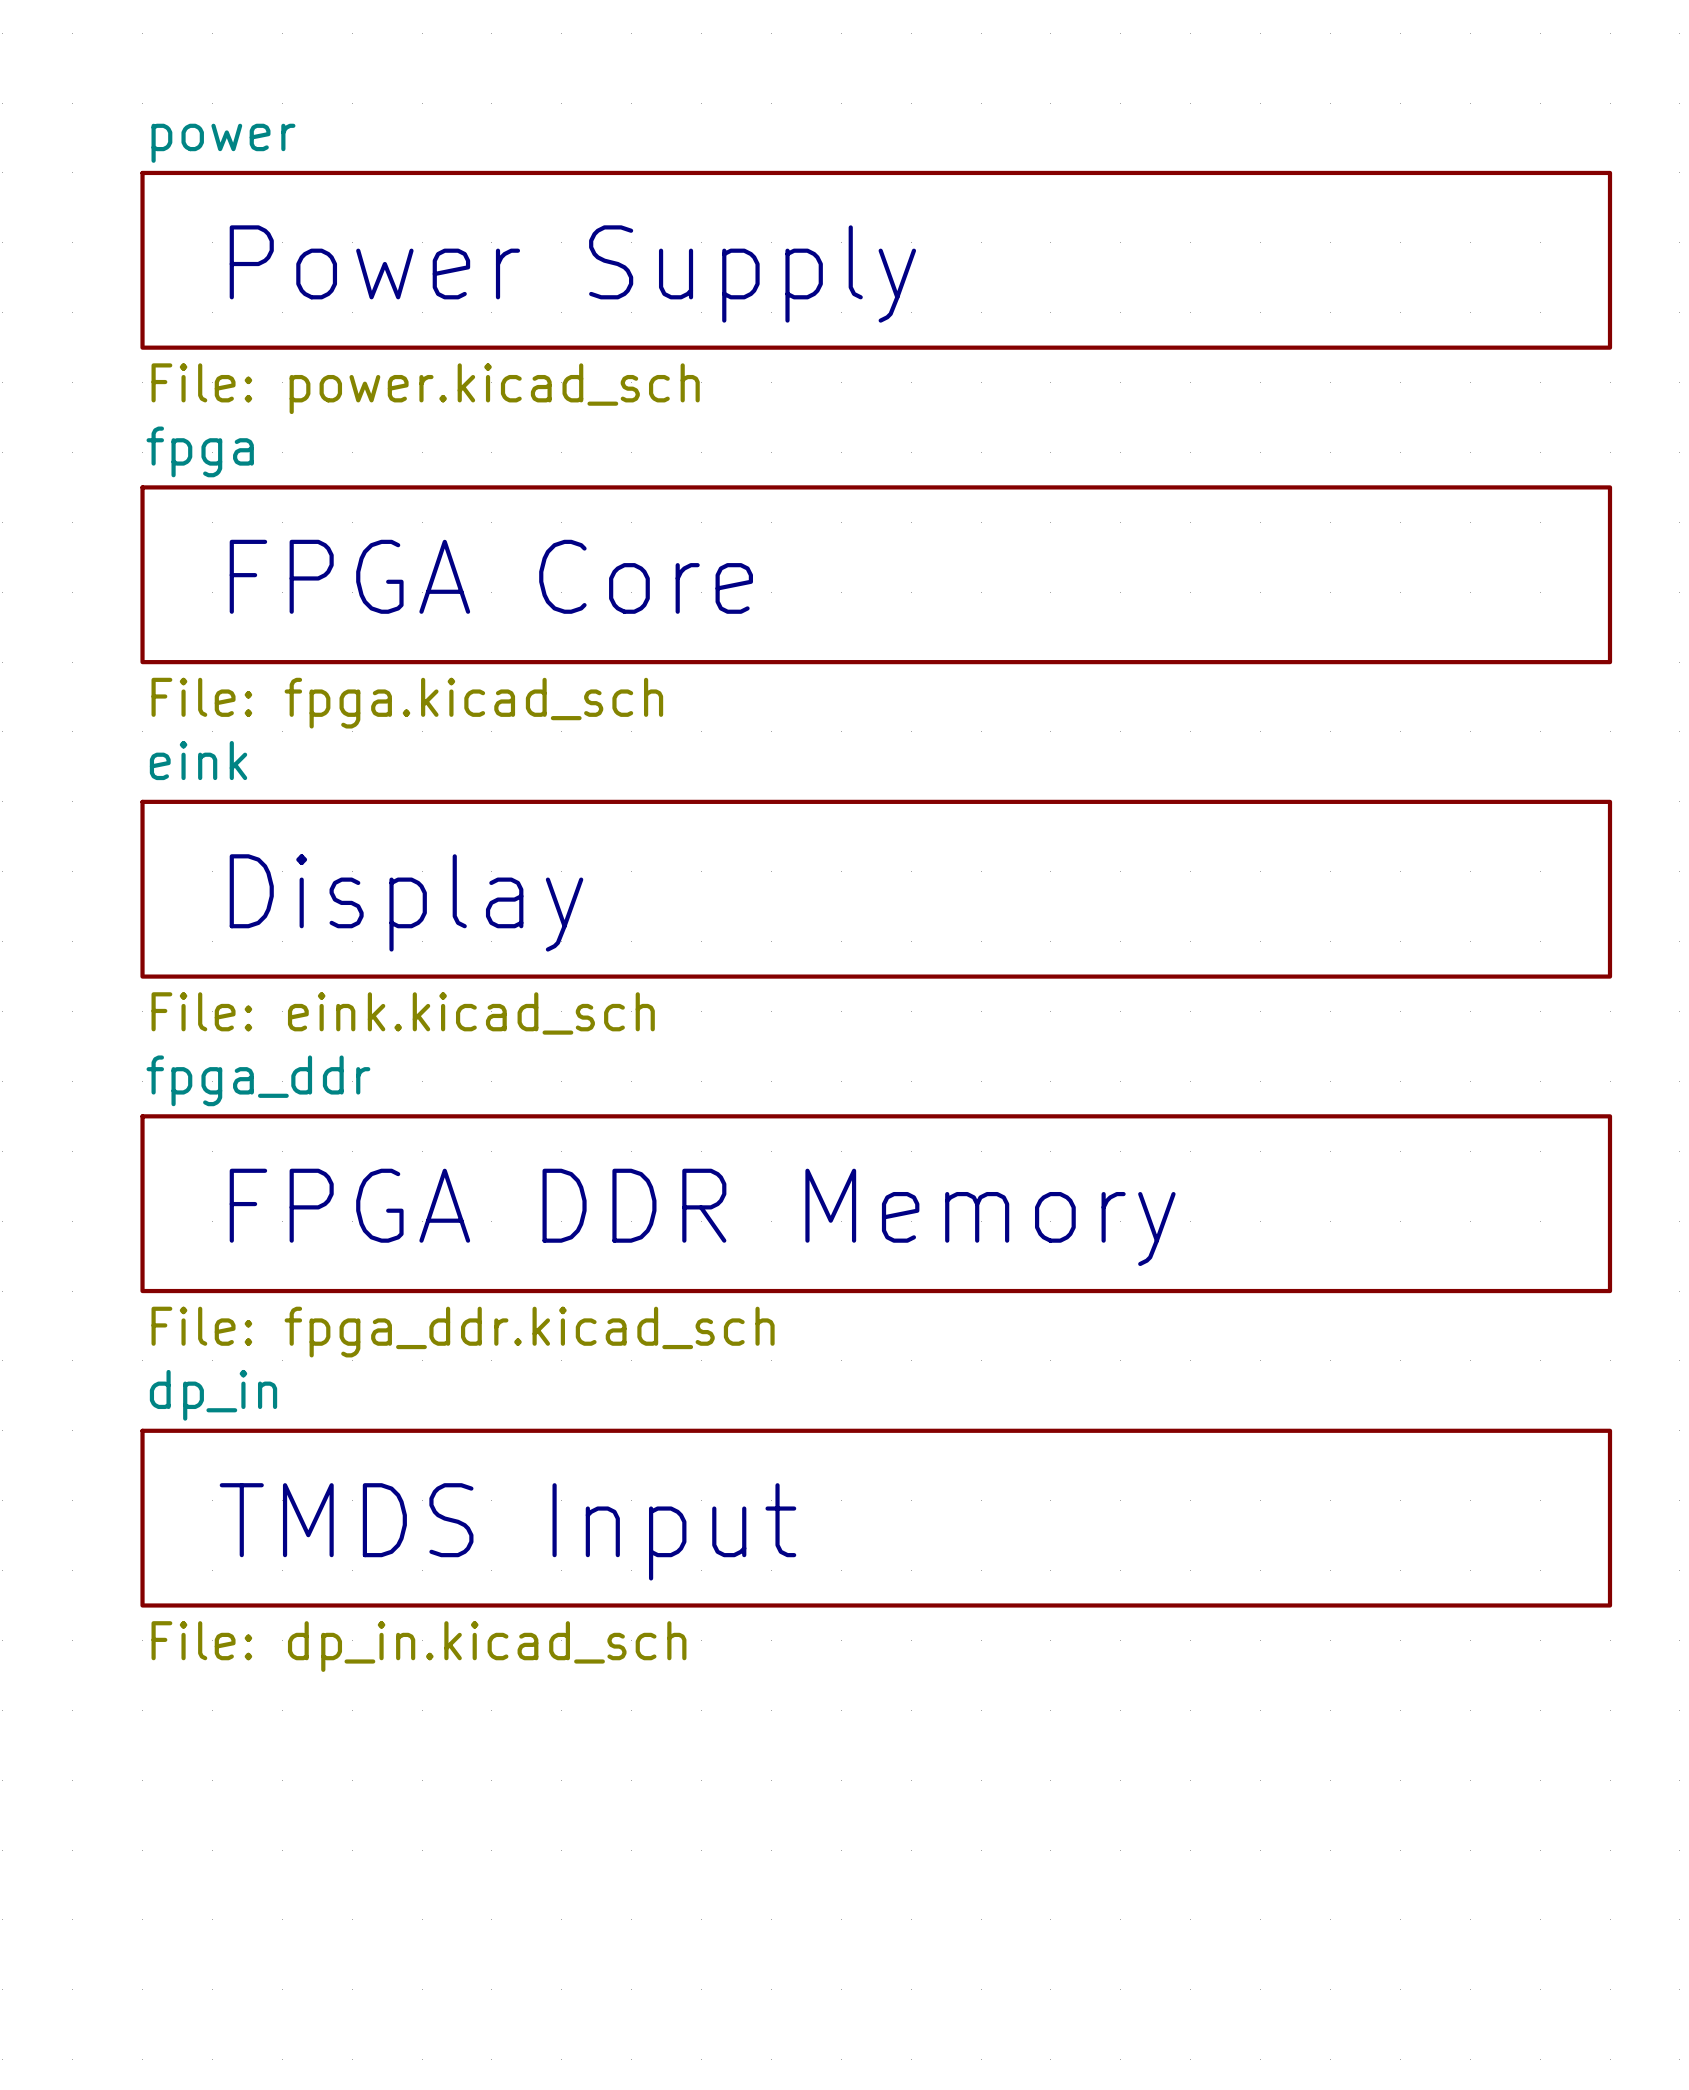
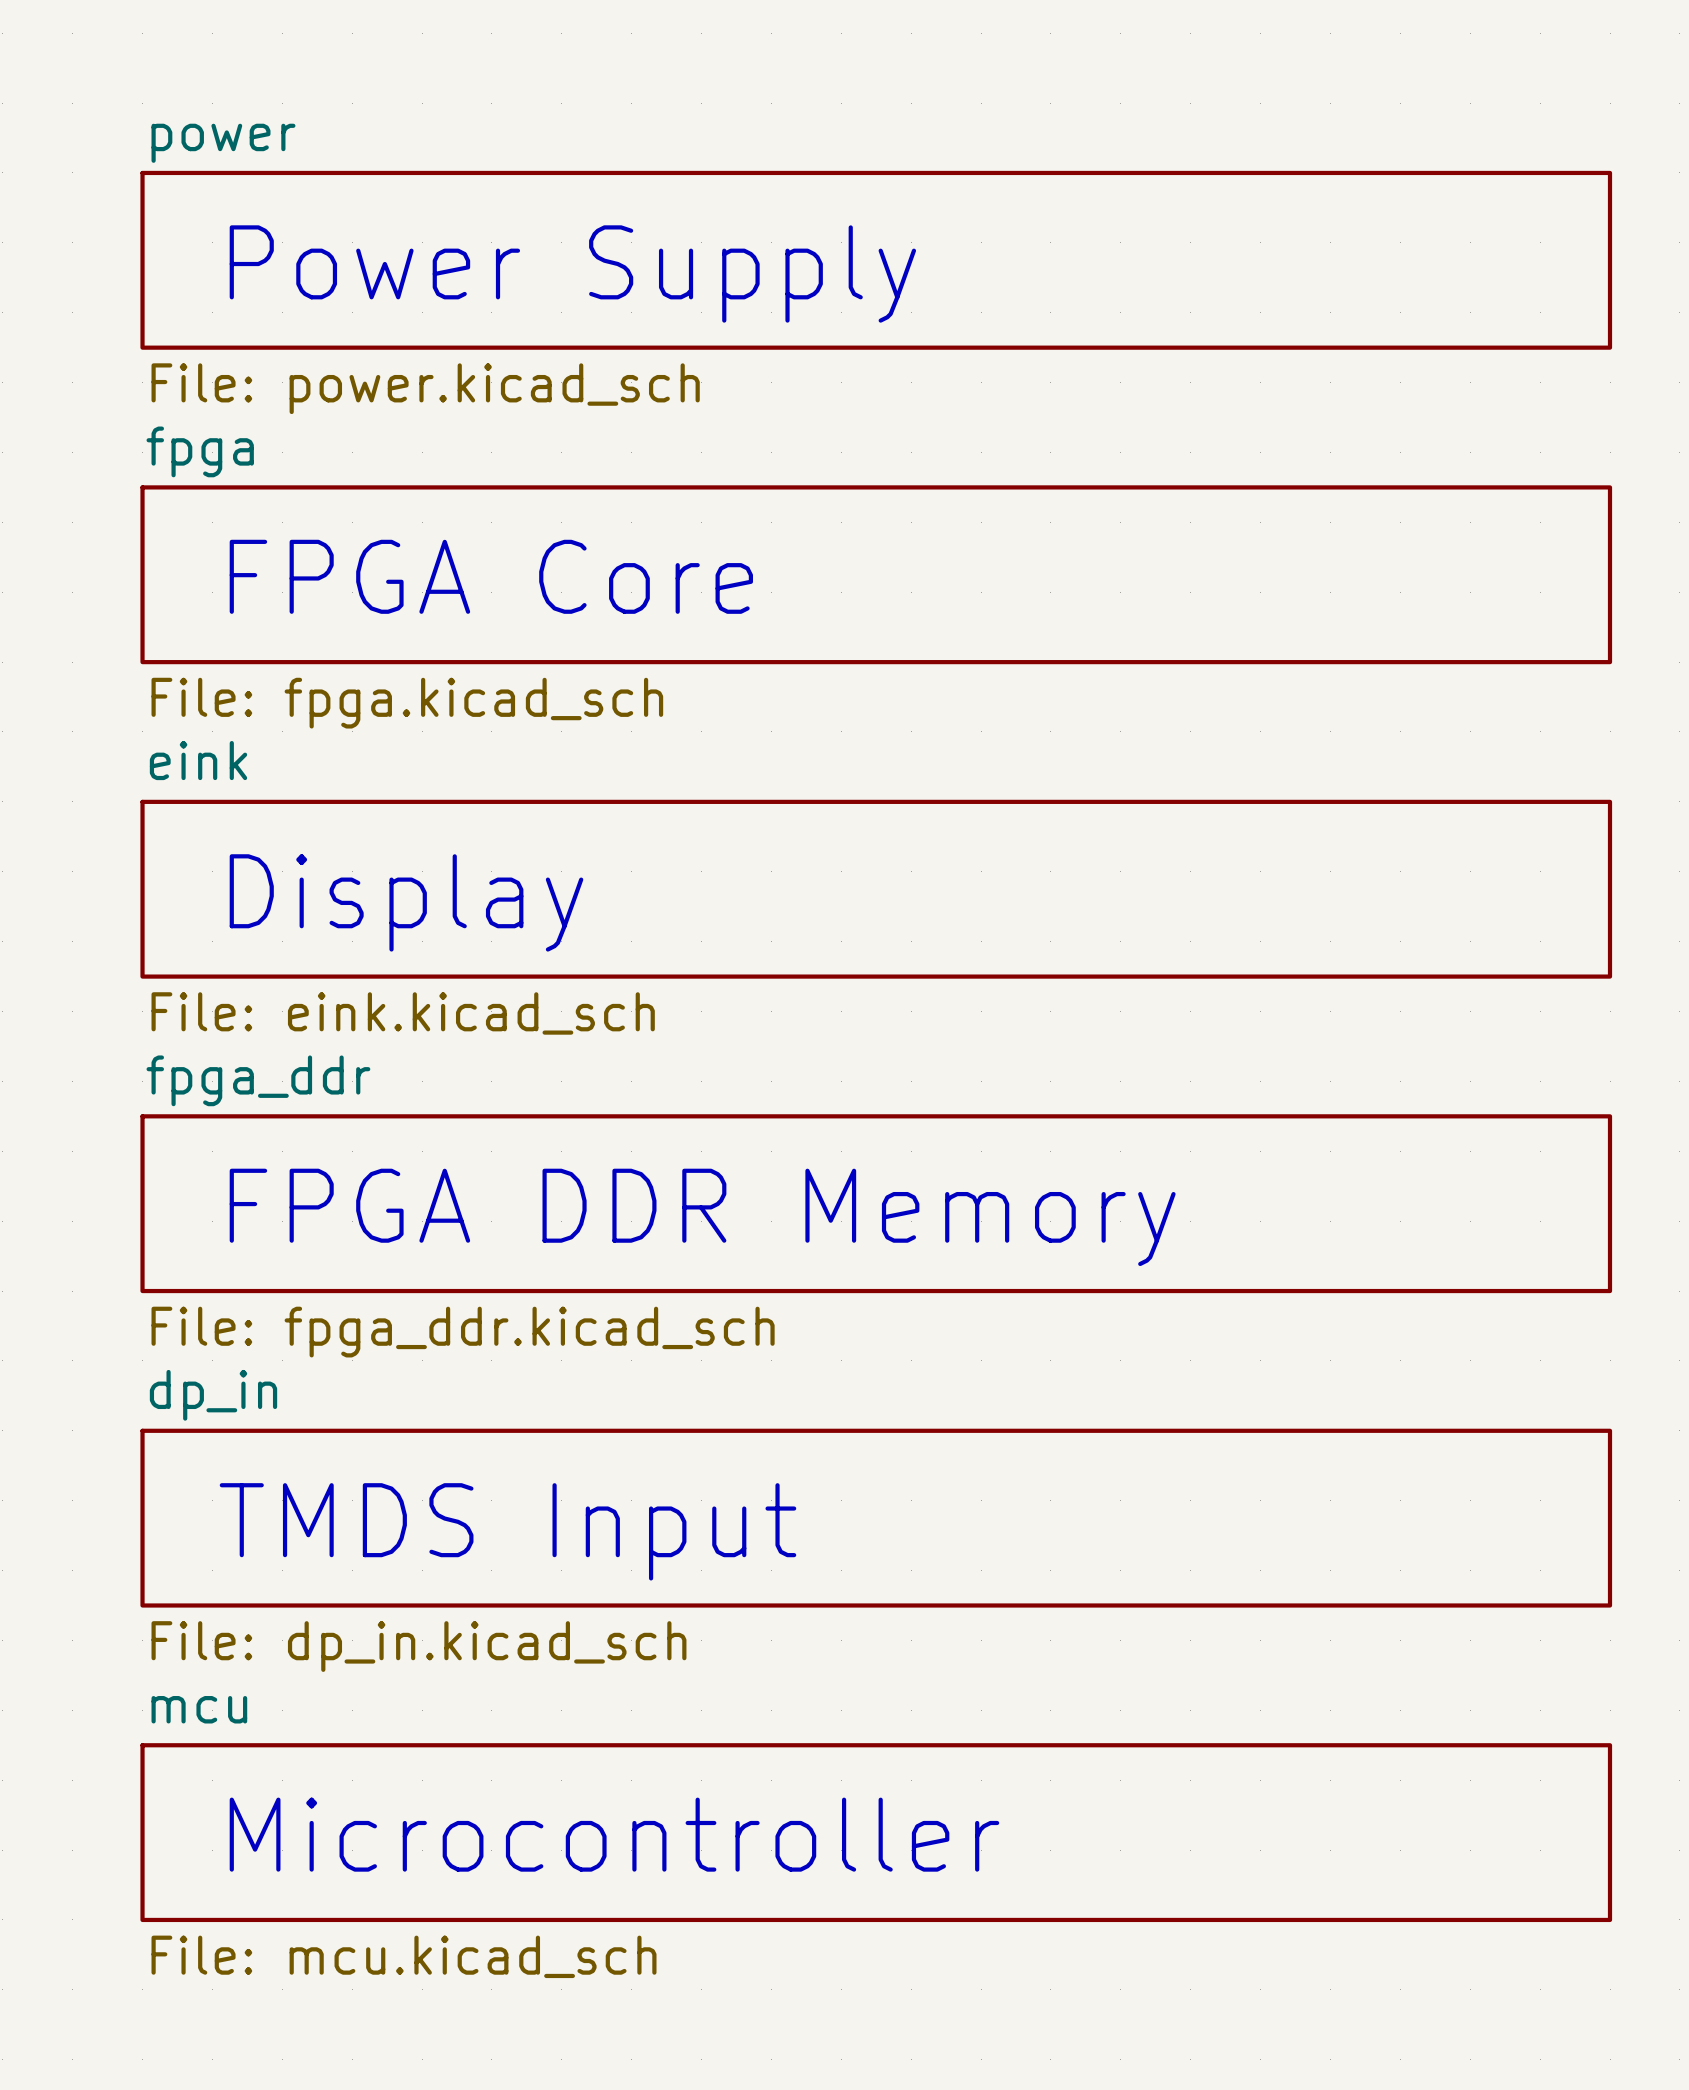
sheet mcu: none -> File: mcu.kicad_sch (876, 1832)
text: none -> Microcontroller (614, 1834)

